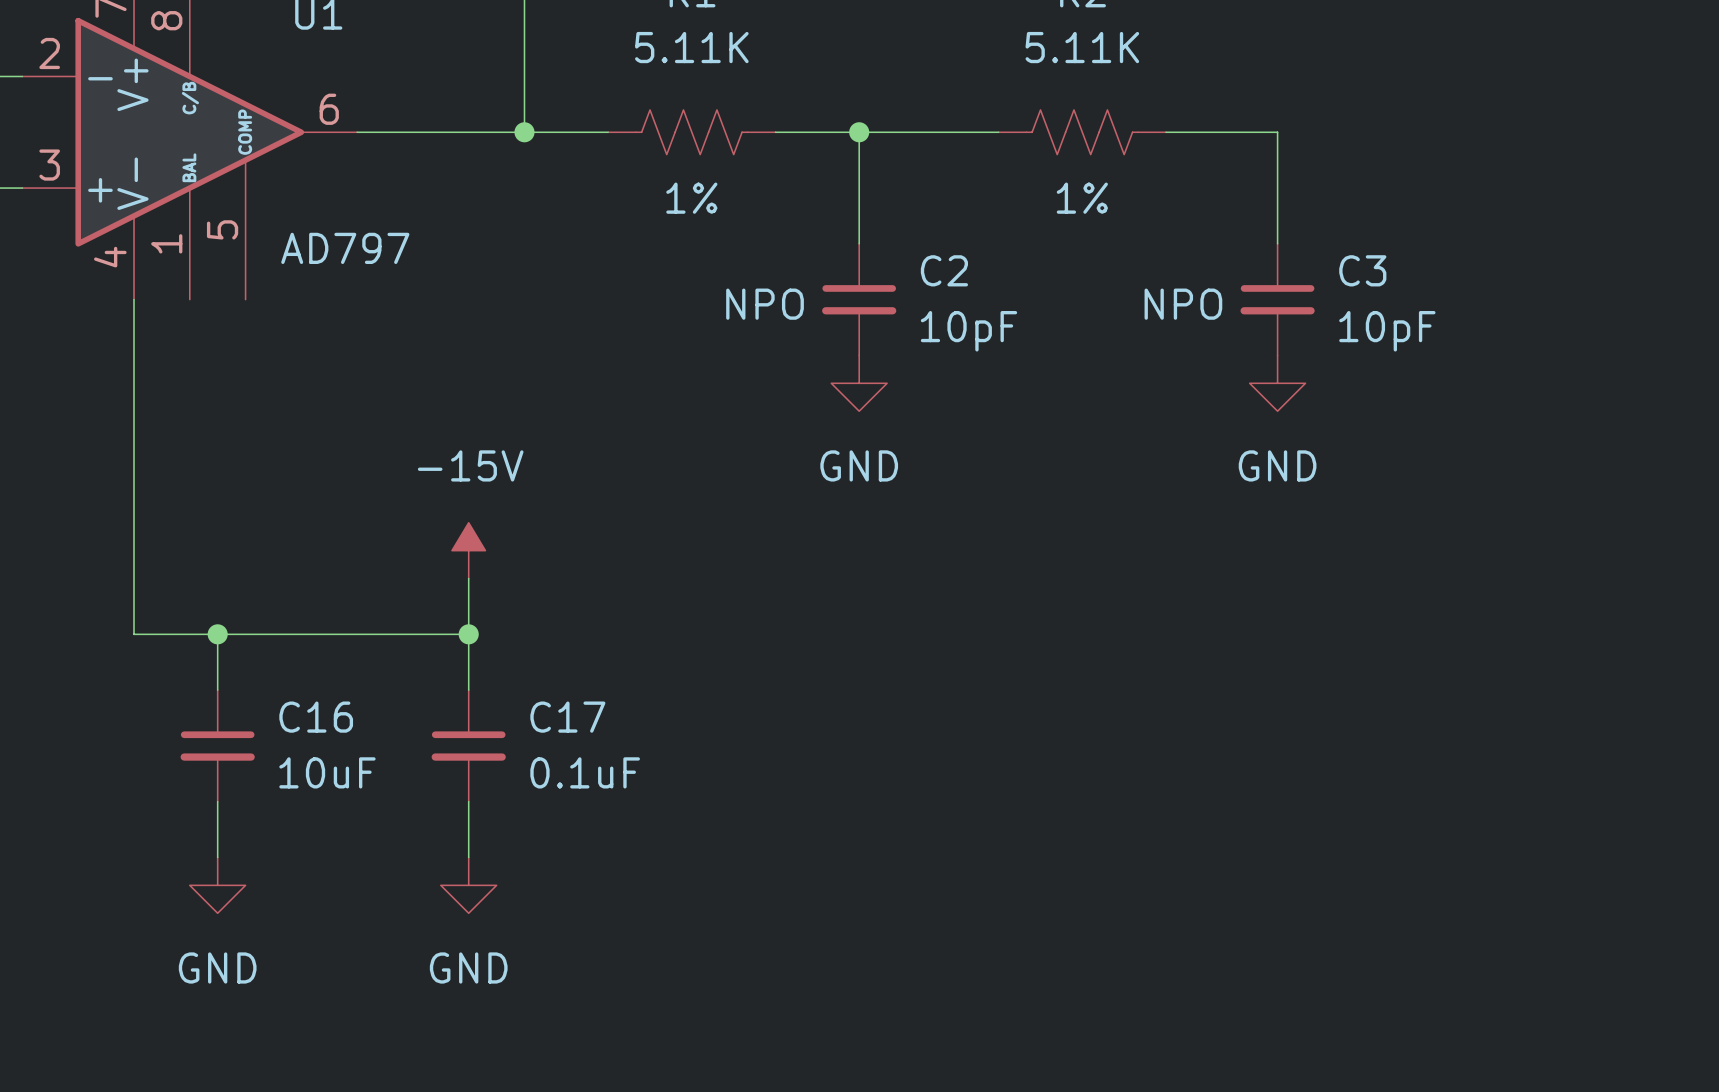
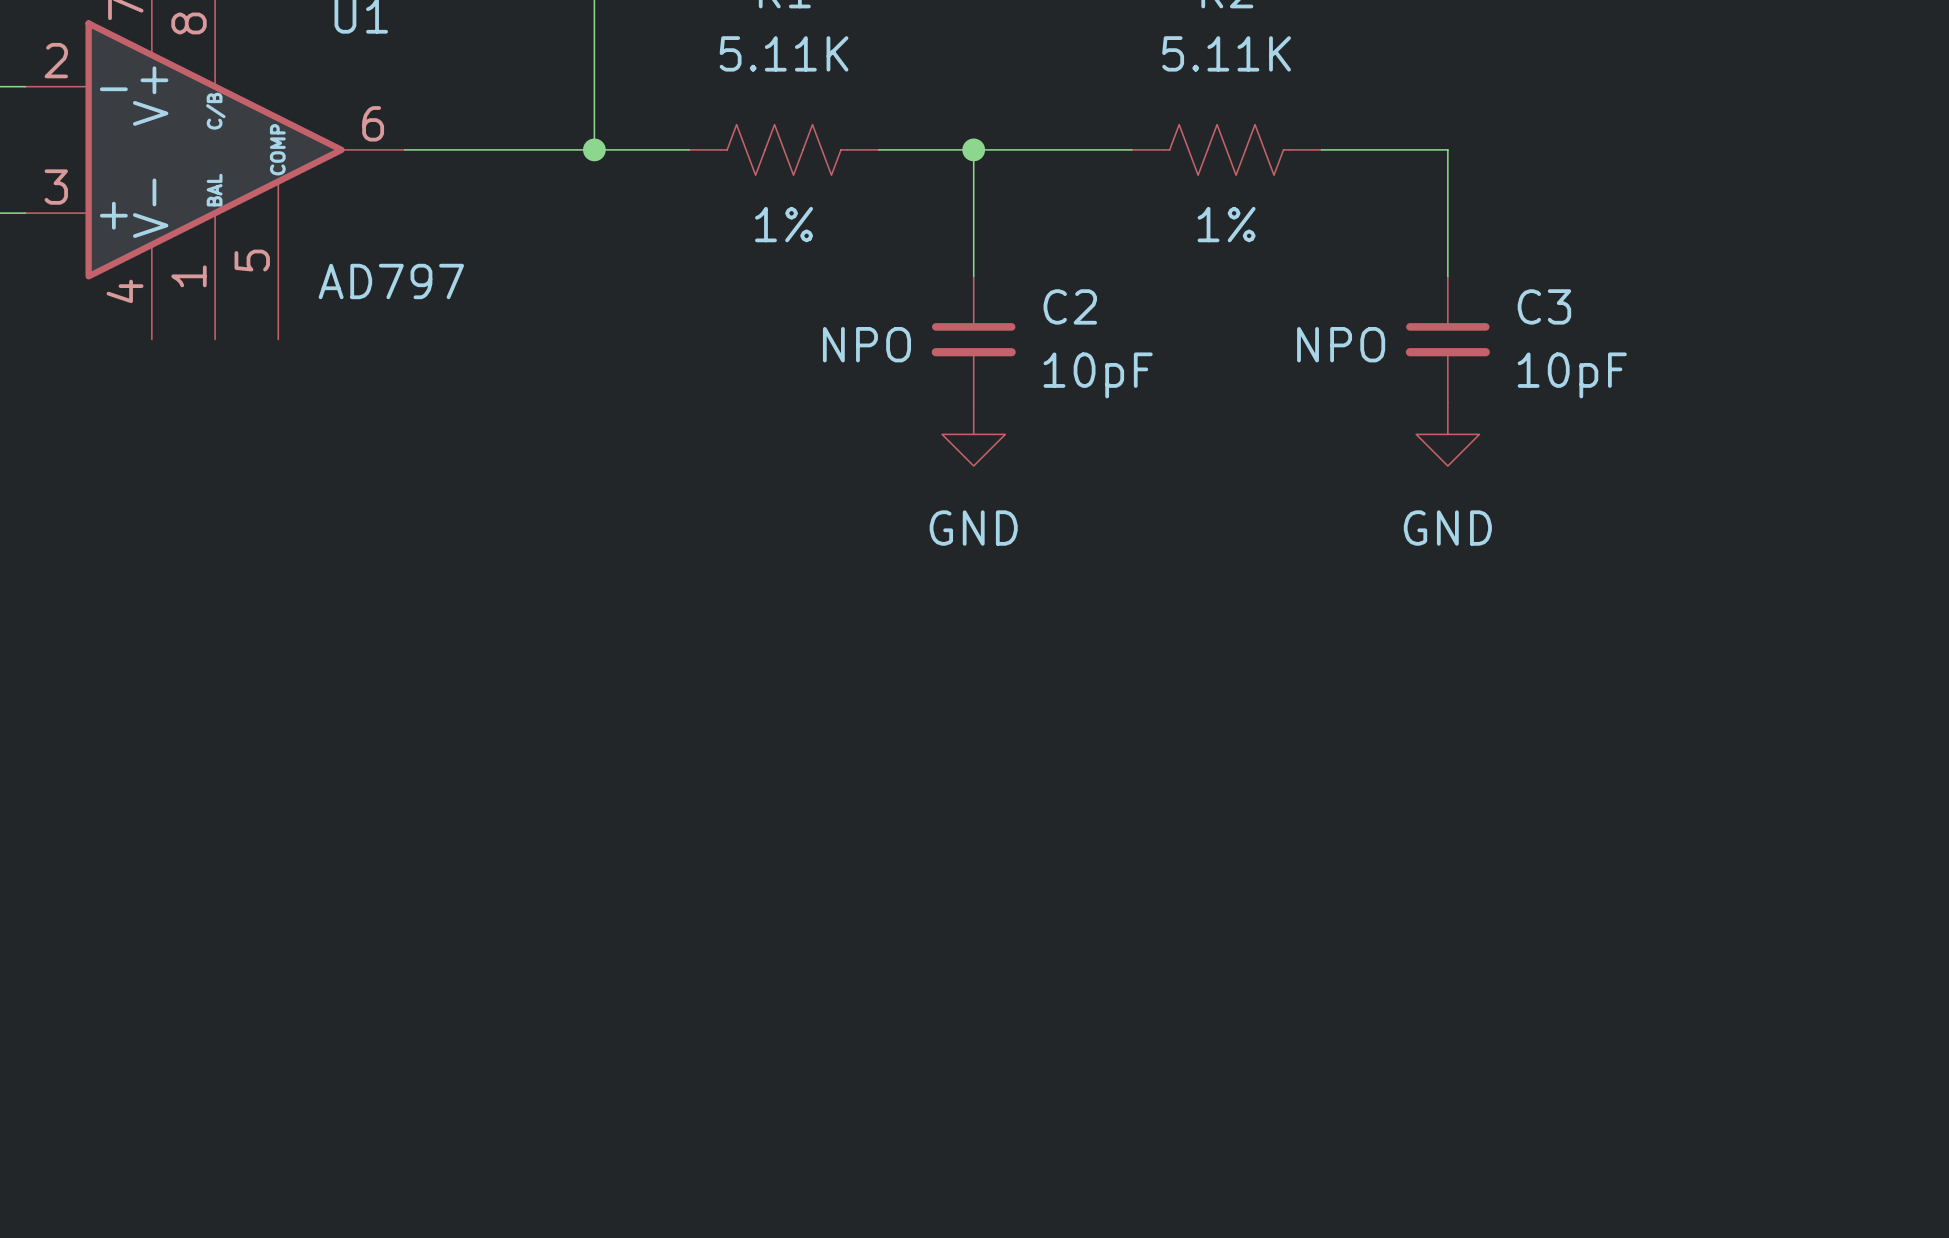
wire: (134, 299) (134, 634) (468, 634) -> none
power symbol: -15V (468, 550) -> none
wire: (468, 578) (468, 690) -> none
wire: (217, 634) (217, 690) -> none
junction: (217, 634) -> none
junction: (468, 634) -> none
C16: 10uF (217, 745) -> none
C17: 0.1uF (468, 745) -> none
wire: (217, 801) (217, 857) -> none
wire: (468, 801) (468, 857) -> none
power symbol: GND (217, 885) -> none
power symbol: GND (468, 885) -> none

